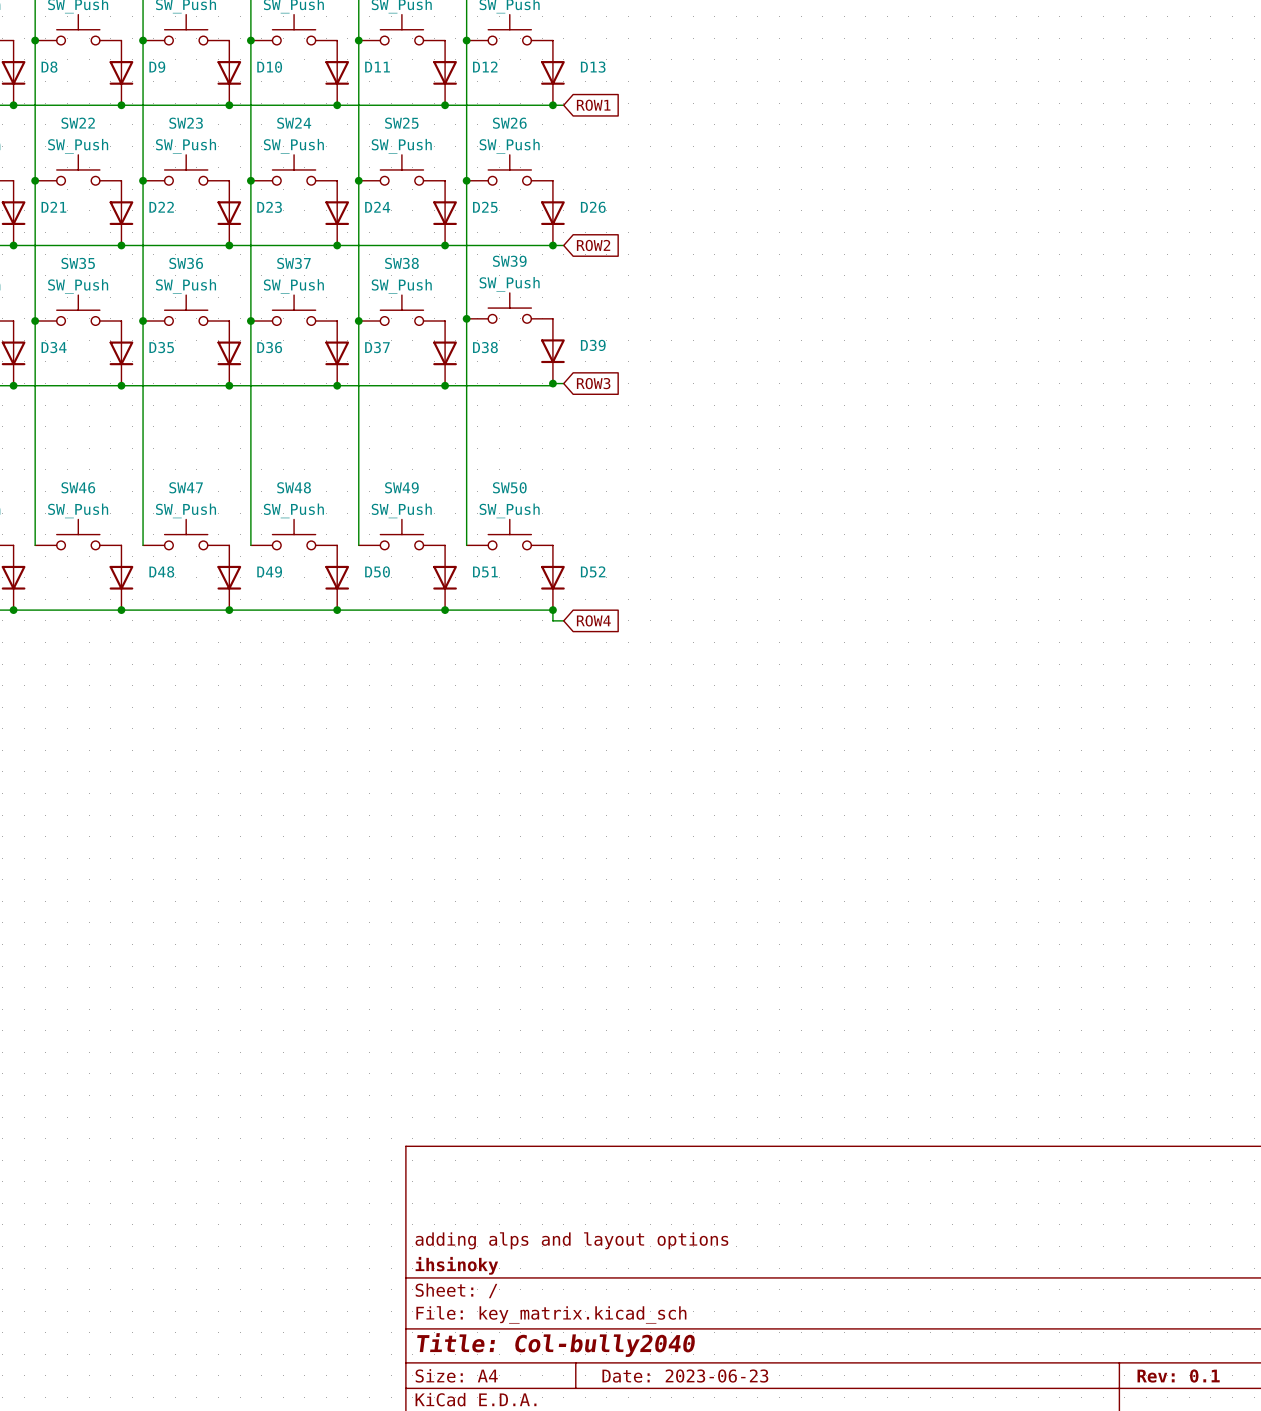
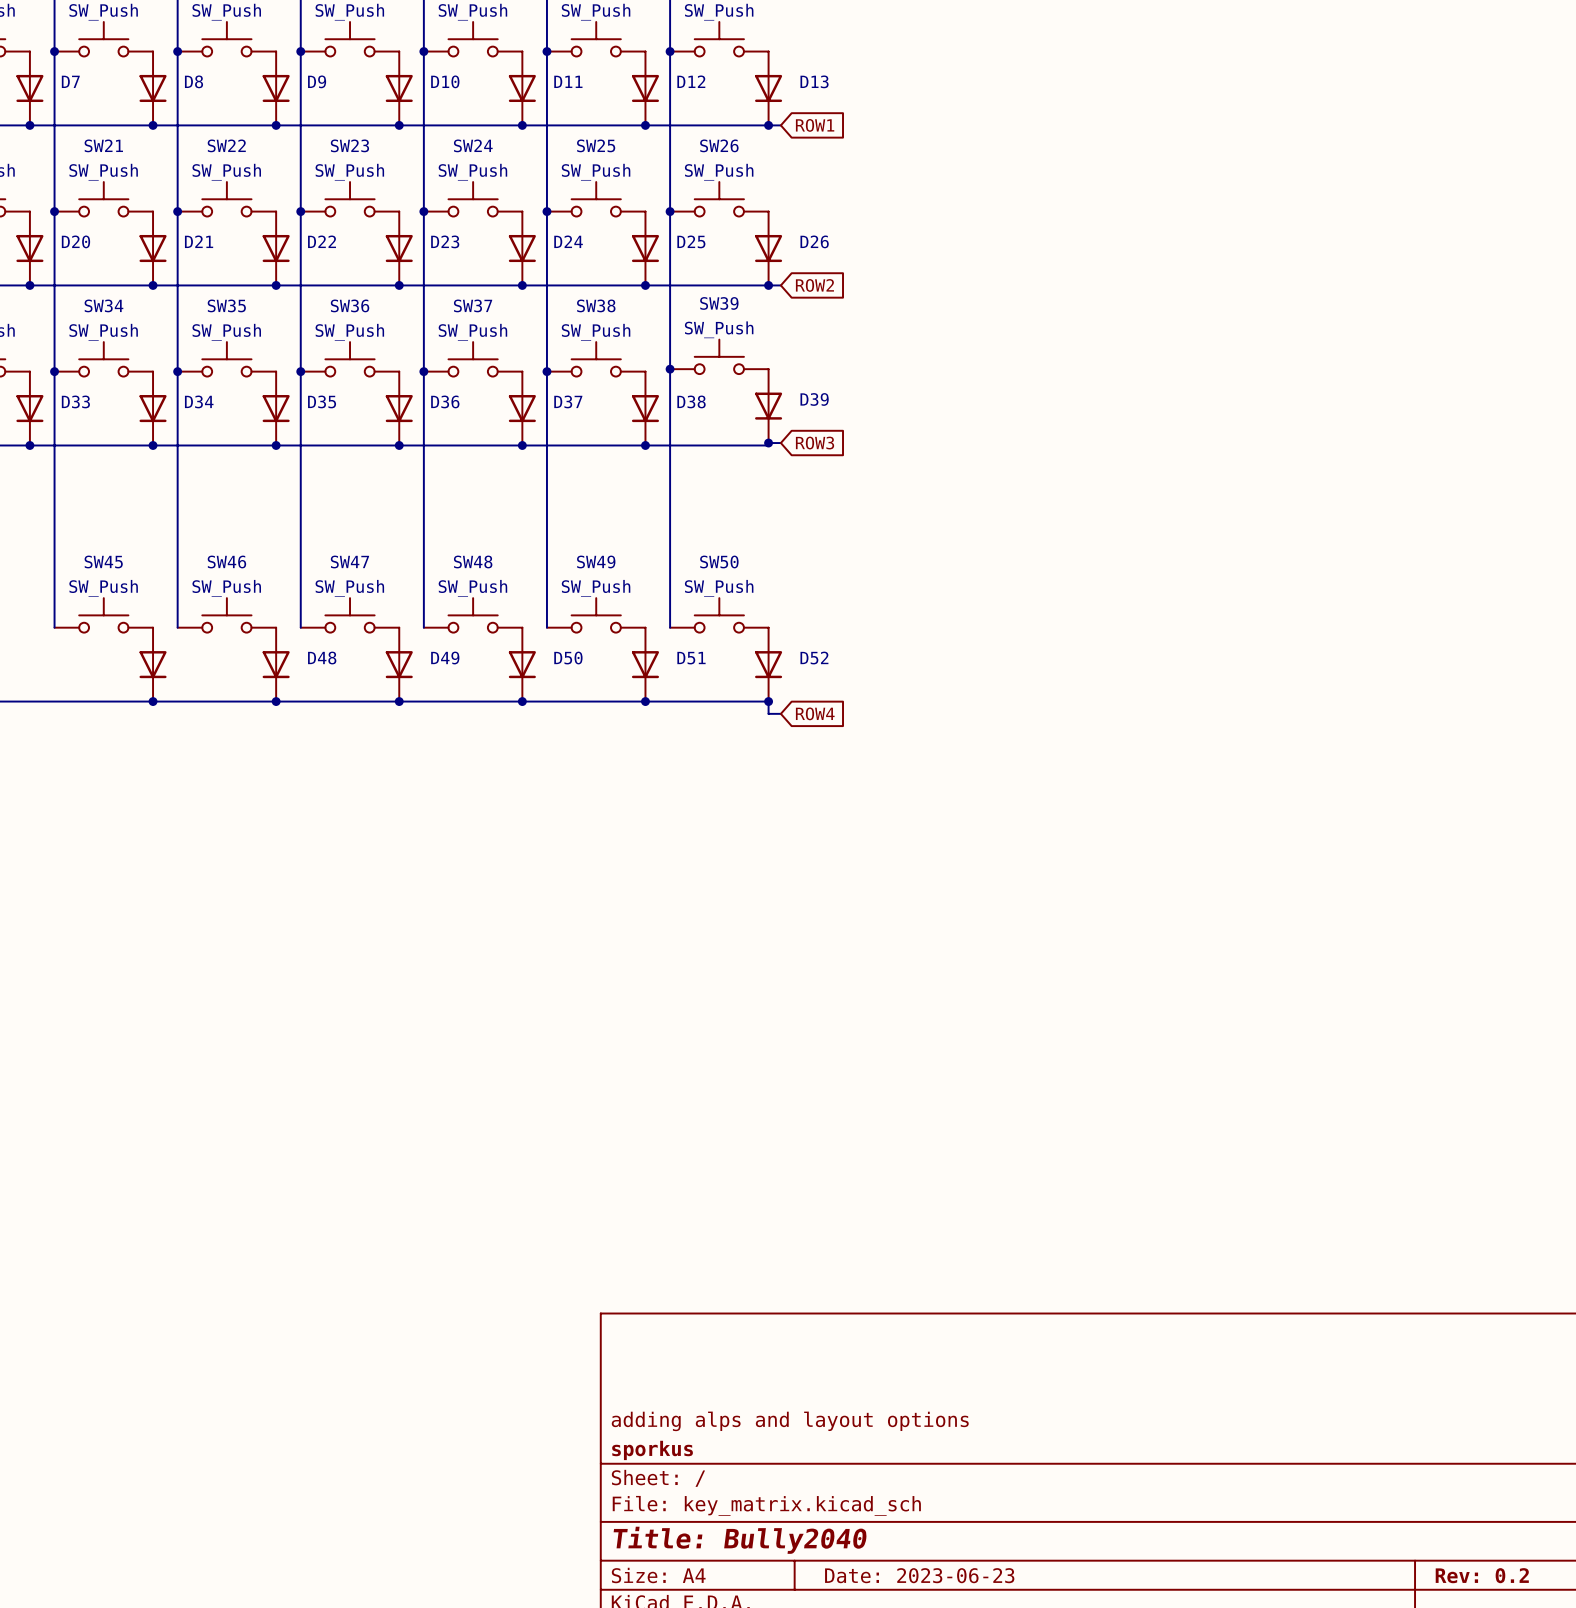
title block: ihsinoky (456, 1265) -> sporkus (652, 1450)
title block: Title: Col-bully2040 (556, 1345) -> Title: Bully2040 (740, 1540)
title block: Rev: 0.1 (1178, 1376) -> Rev: 0.2 (1482, 1575)

